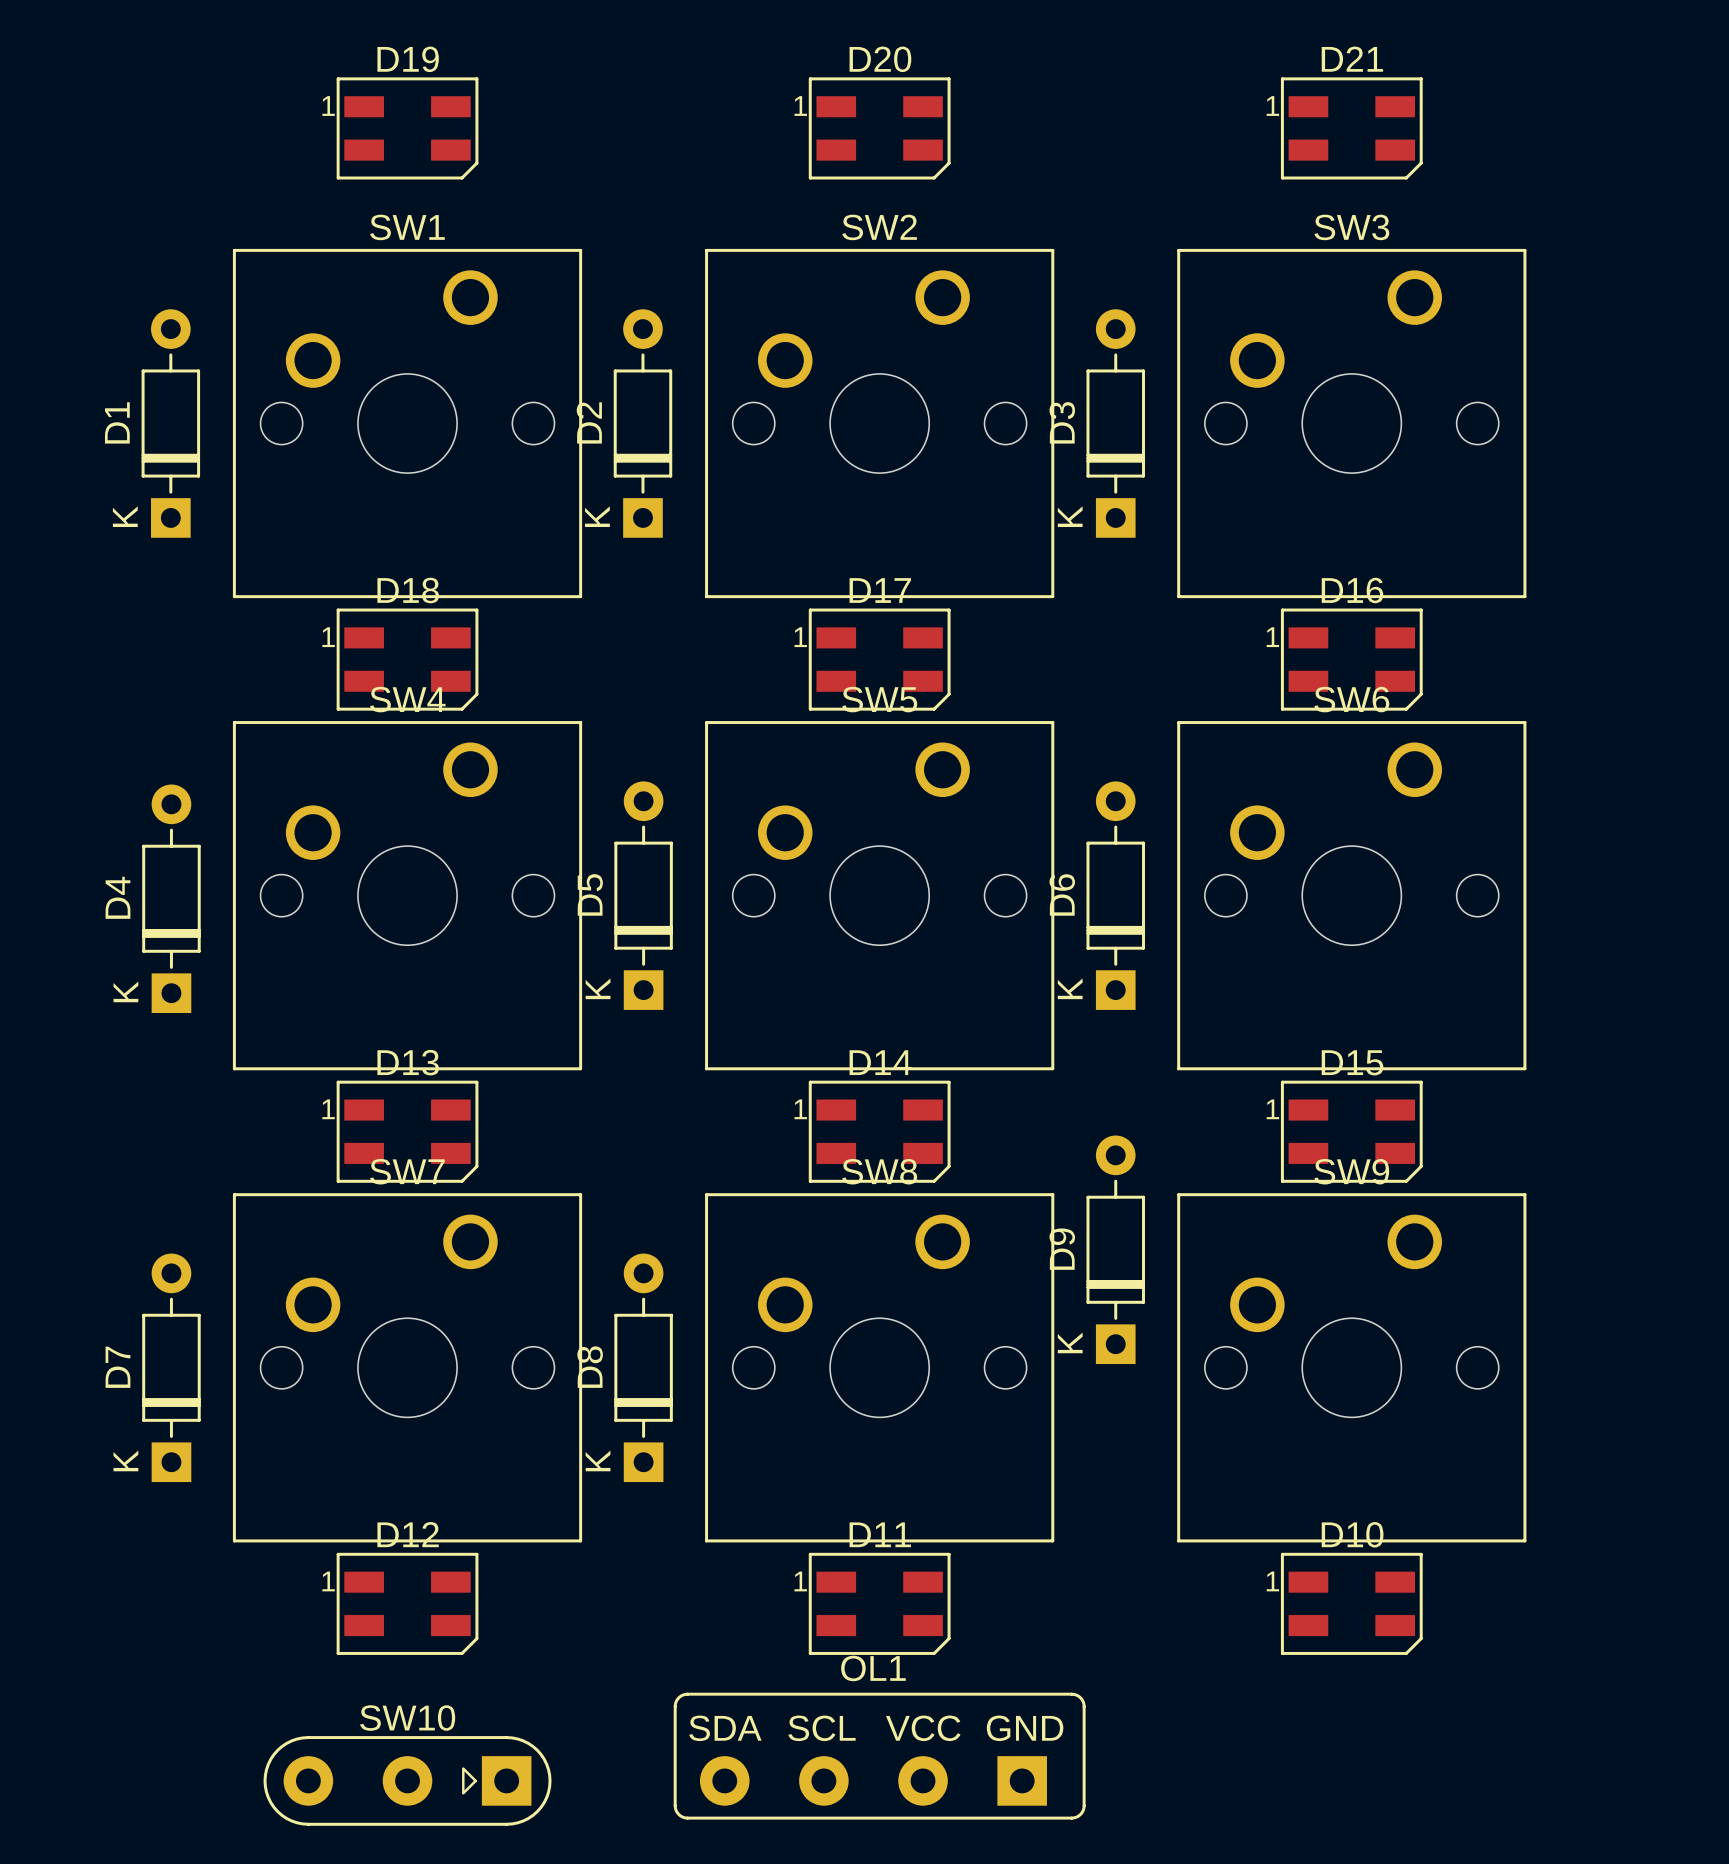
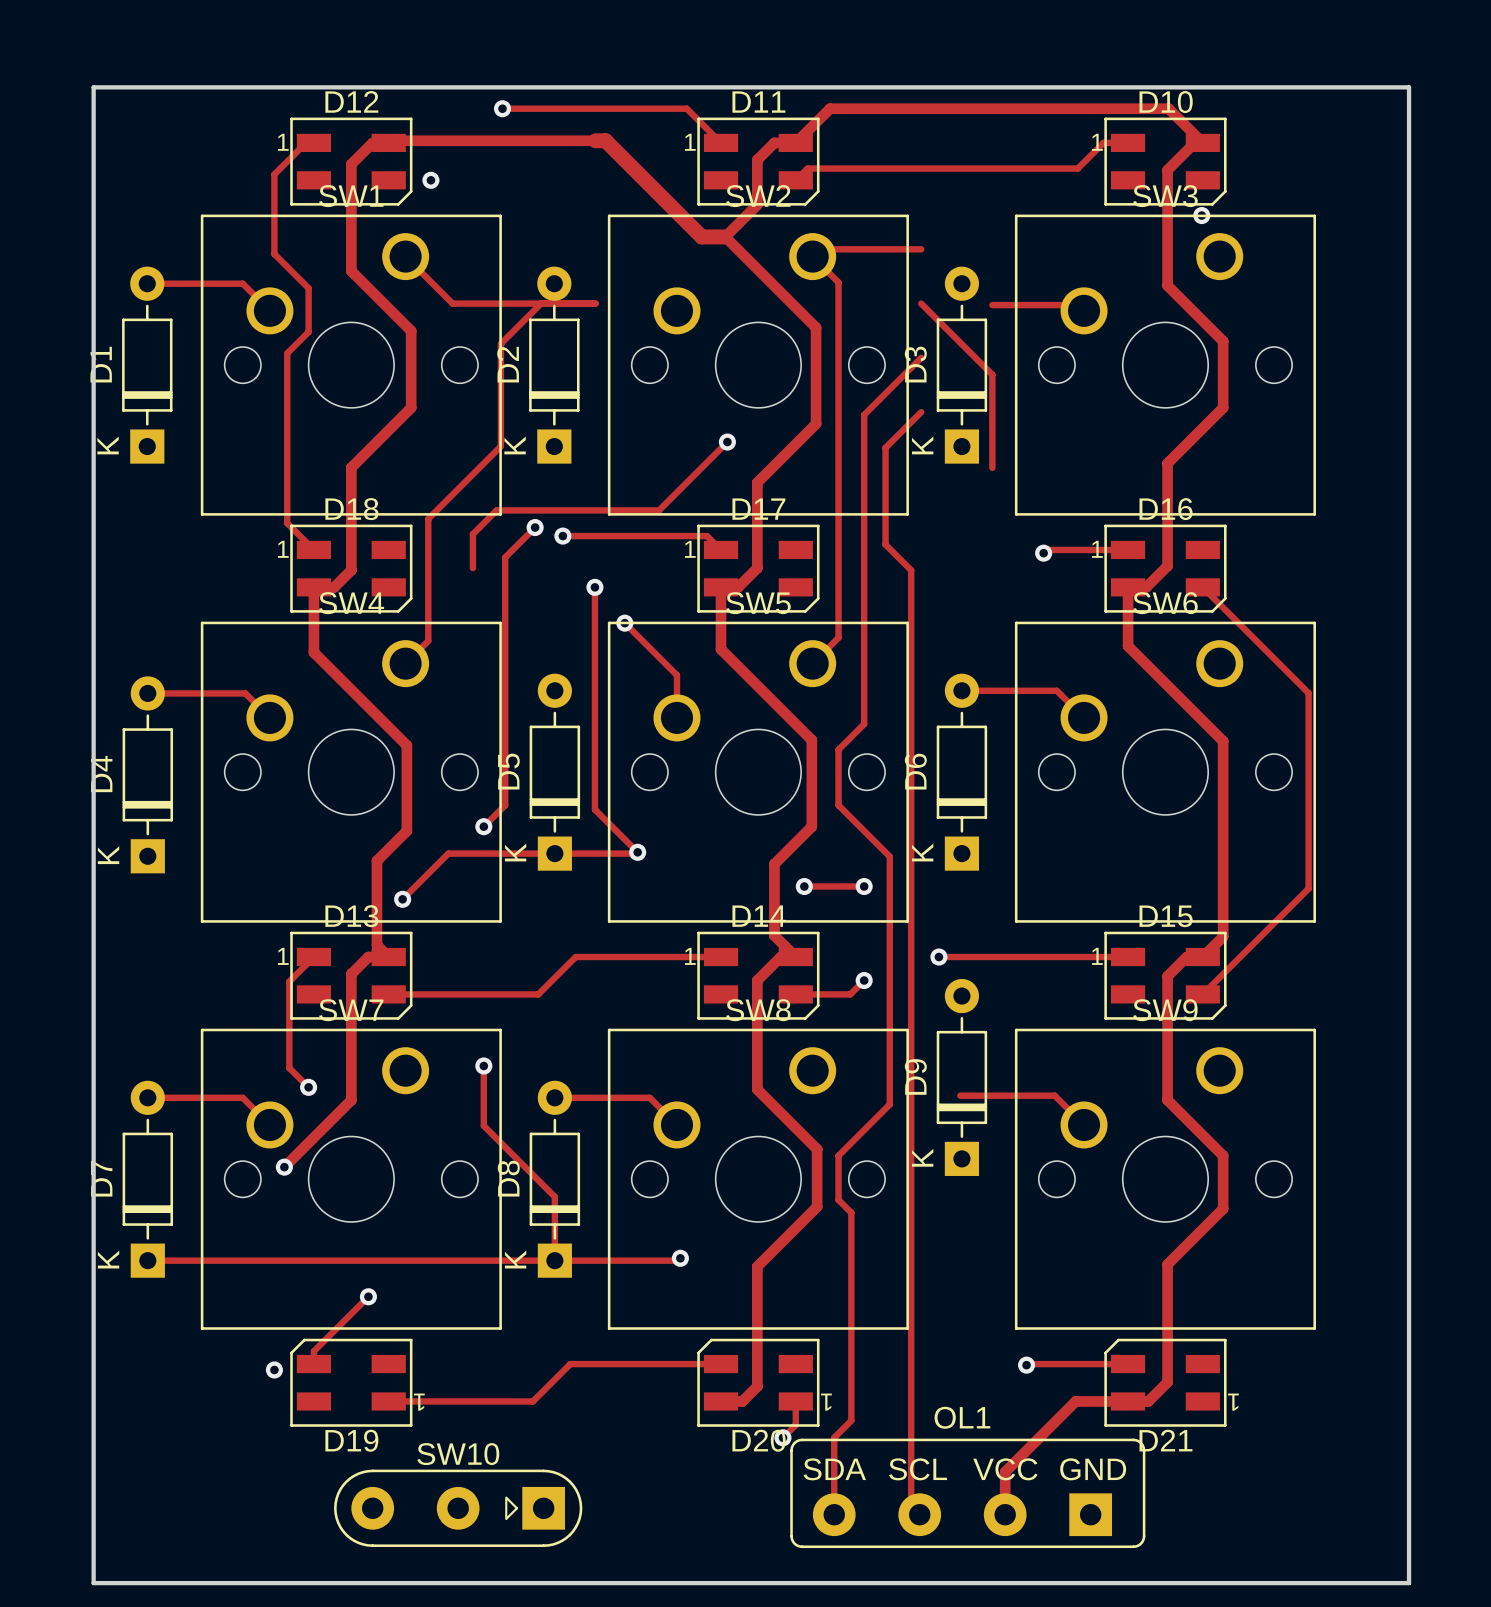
board edge: none -> (93, 87) (1409, 87) (1409, 1583) (93, 1583) (93, 87)
track: none -> (502, 108) (686, 108) (721, 142)
via: none -> (502, 108)
D19 rotation: 0° (407, 128) -> 180° (351, 1382)
D19 position: (407, 128) -> (351, 1382)
D20 rotation: 0° (879, 128) -> 180° (758, 1382)
D20 position: (879, 128) -> (758, 1382)
D21 rotation: 0° (1351, 128) -> 180° (1165, 1382)
D21 position: (1351, 128) -> (1165, 1382)
track: none -> (313, 142) (305, 142) (274, 174) (274, 254) (308, 288) (308, 332) (287, 353) (287, 523) (313, 549)
track: none -> (1128, 142) (1103, 142) (1077, 168) (807, 168) (795, 180)
via: none -> (430, 180)
via: none -> (1201, 215)
track: none -> (725, 236) (757, 204) (757, 160) (774, 142) (795, 142) (829, 108) (1168, 108) (1202, 142) (1194, 142) (1167, 170) (1167, 285) (1223, 341) (1223, 407) (1167, 463) (1167, 565) (1146, 587) (1128, 587) (1128, 646) (1223, 741) (1223, 936) (1202, 957) (1186, 957) (1167, 976) (1167, 1100) (1223, 1155) (1223, 1208) (1167, 1264) (1167, 1382) (1148, 1401) (1075, 1401) (1005, 1471) (1005, 1514)
track: none -> (725, 236) (816, 327) (816, 423) (757, 482) (757, 568) (738, 587) (721, 587) (721, 649) (811, 740) (811, 826) (774, 864) (774, 935) (795, 957) (780, 957) (757, 980) (757, 1089) (817, 1149) (817, 1206) (757, 1266) (757, 1386) (742, 1401) (721, 1401)
track: none -> (725, 236) (701, 236) (605, 140) (390, 140) (388, 142) (372, 142) (351, 164) (351, 271) (411, 330) (411, 407) (351, 467) (351, 570) (334, 587) (313, 587) (313, 652) (406, 745) (406, 830) (376, 860) (376, 945) (388, 957) (368, 957) (351, 974) (351, 1100) (284, 1167)
track: none -> (921, 249) (819, 249) (812, 256) (838, 282) (838, 637) (812, 663)
track: none -> (405, 256) (452, 303) (595, 303)
track: none -> (147, 283) (242, 283) (269, 310)
track: none -> (541, 303) (500, 343) (500, 446) (428, 518) (428, 640) (405, 663)
track: none -> (921, 303) (992, 374) (992, 467)
track: none -> (992, 305) (1078, 305) (1084, 310)
track: none -> (921, 357) (864, 414) (864, 724) (838, 749) (838, 805) (889, 856) (889, 1104) (838, 1155) (838, 1199) (851, 1212) (851, 1420) (834, 1437) (834, 1514)
track: none -> (921, 412) (885, 447) (885, 544) (911, 570) (911, 1506) (919, 1514)
track: none -> (727, 442) (659, 510) (496, 510) (472, 534) (472, 568)
via: none -> (727, 442)
track: none -> (535, 527) (505, 557) (505, 805) (483, 826)
via: none -> (535, 527)
track: none -> (562, 536) (707, 536) (721, 549)
via: none -> (562, 536)
track: none -> (1128, 549) (1046, 549) (1043, 553)
via: none -> (1043, 553)
track: none -> (594, 587) (594, 809) (637, 852) (448, 853) (402, 899)
via: none -> (594, 587)
track: none -> (1202, 587) (1308, 693) (1308, 888) (1202, 994)
track: none -> (624, 623) (676, 675) (676, 717)
via: none -> (624, 623)
track: none -> (961, 690) (1056, 690) (1084, 717)
track: none -> (147, 693) (245, 693) (269, 717)
via: none -> (483, 826)
via: none -> (637, 852)
track: none -> (804, 886) (864, 886)
via: none -> (804, 886)
via: none -> (864, 886)
via: none -> (402, 899)
track: none -> (313, 957) (289, 981) (289, 1068) (308, 1087)
track: none -> (721, 957) (575, 957) (538, 994) (388, 994)
track: none -> (938, 957) (1128, 957)
via: none -> (938, 957)
track: none -> (864, 980) (850, 994) (795, 994)
via: none -> (864, 980)
track: none -> (483, 1065) (483, 1125) (554, 1196) (554, 1260)
via: none -> (483, 1065)
via: none -> (308, 1087)
track: none -> (960, 1095) (1054, 1095) (1084, 1124)
track: none -> (147, 1097) (242, 1097) (269, 1124)
track: none -> (554, 1097) (649, 1097) (676, 1124)
via: none -> (284, 1167)
track: none -> (680, 1258) (678, 1260) (147, 1260)
via: none -> (680, 1258)
track: none -> (368, 1296) (313, 1351) (313, 1364)
via: none -> (368, 1296)
track: none -> (721, 1364) (570, 1364) (532, 1401) (388, 1401)
track: none -> (1128, 1364) (1026, 1365)
via: none -> (1026, 1365)
via: none -> (274, 1369)
D12 position: (407, 1603) -> (351, 161)
D11 position: (879, 1603) -> (758, 161)
D10 position: (1351, 1603) -> (1165, 161)
track: none -> (795, 1401) (795, 1424) (782, 1437)
via: none -> (782, 1437)
OL1 position: (879, 1756) -> (967, 1493)
SW10 position: (407, 1780) -> (458, 1508)

